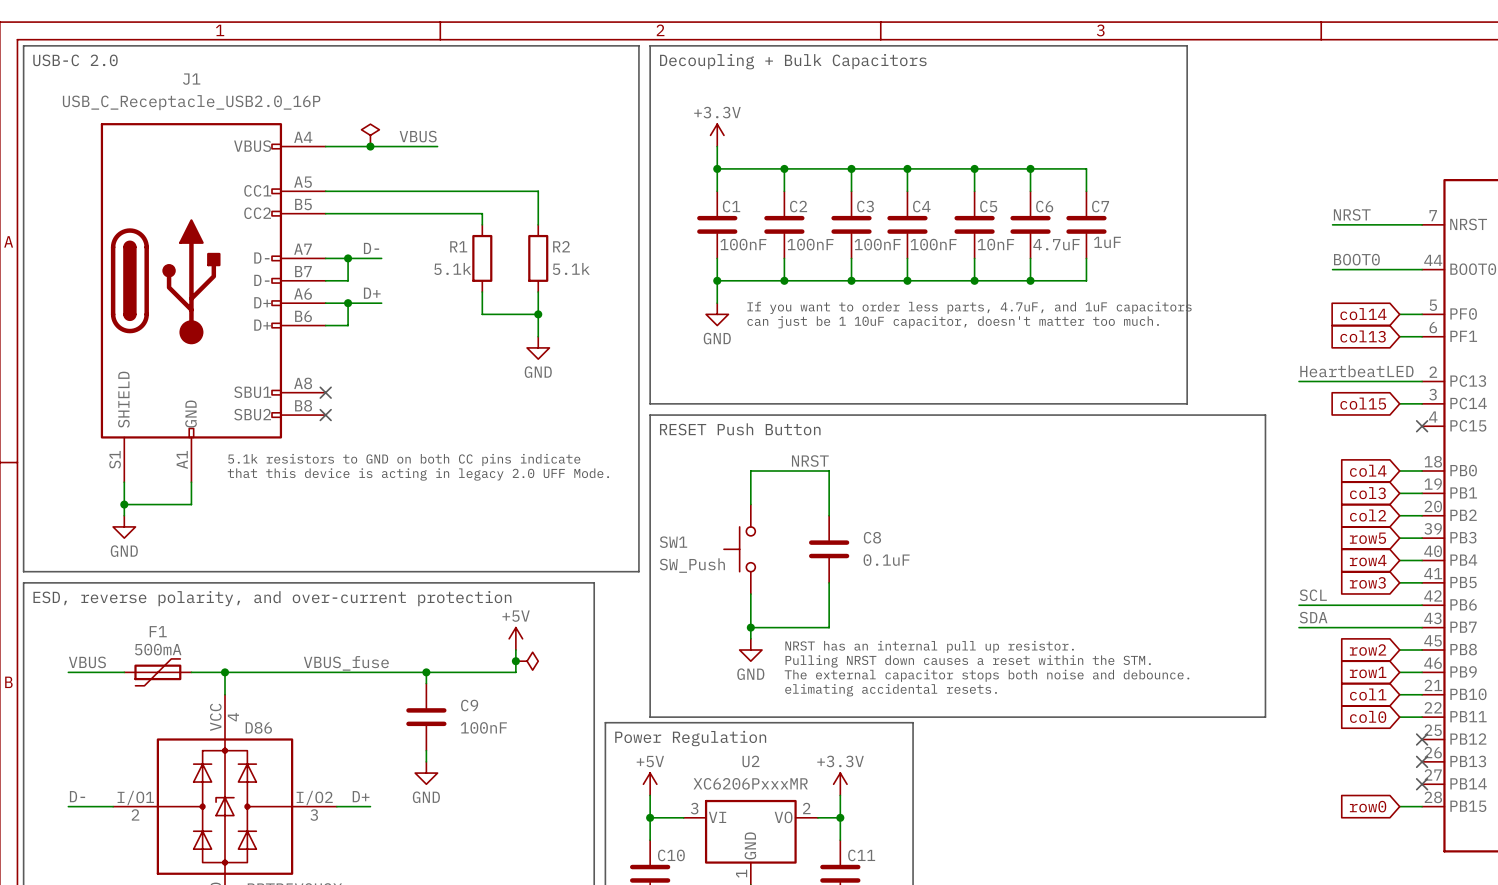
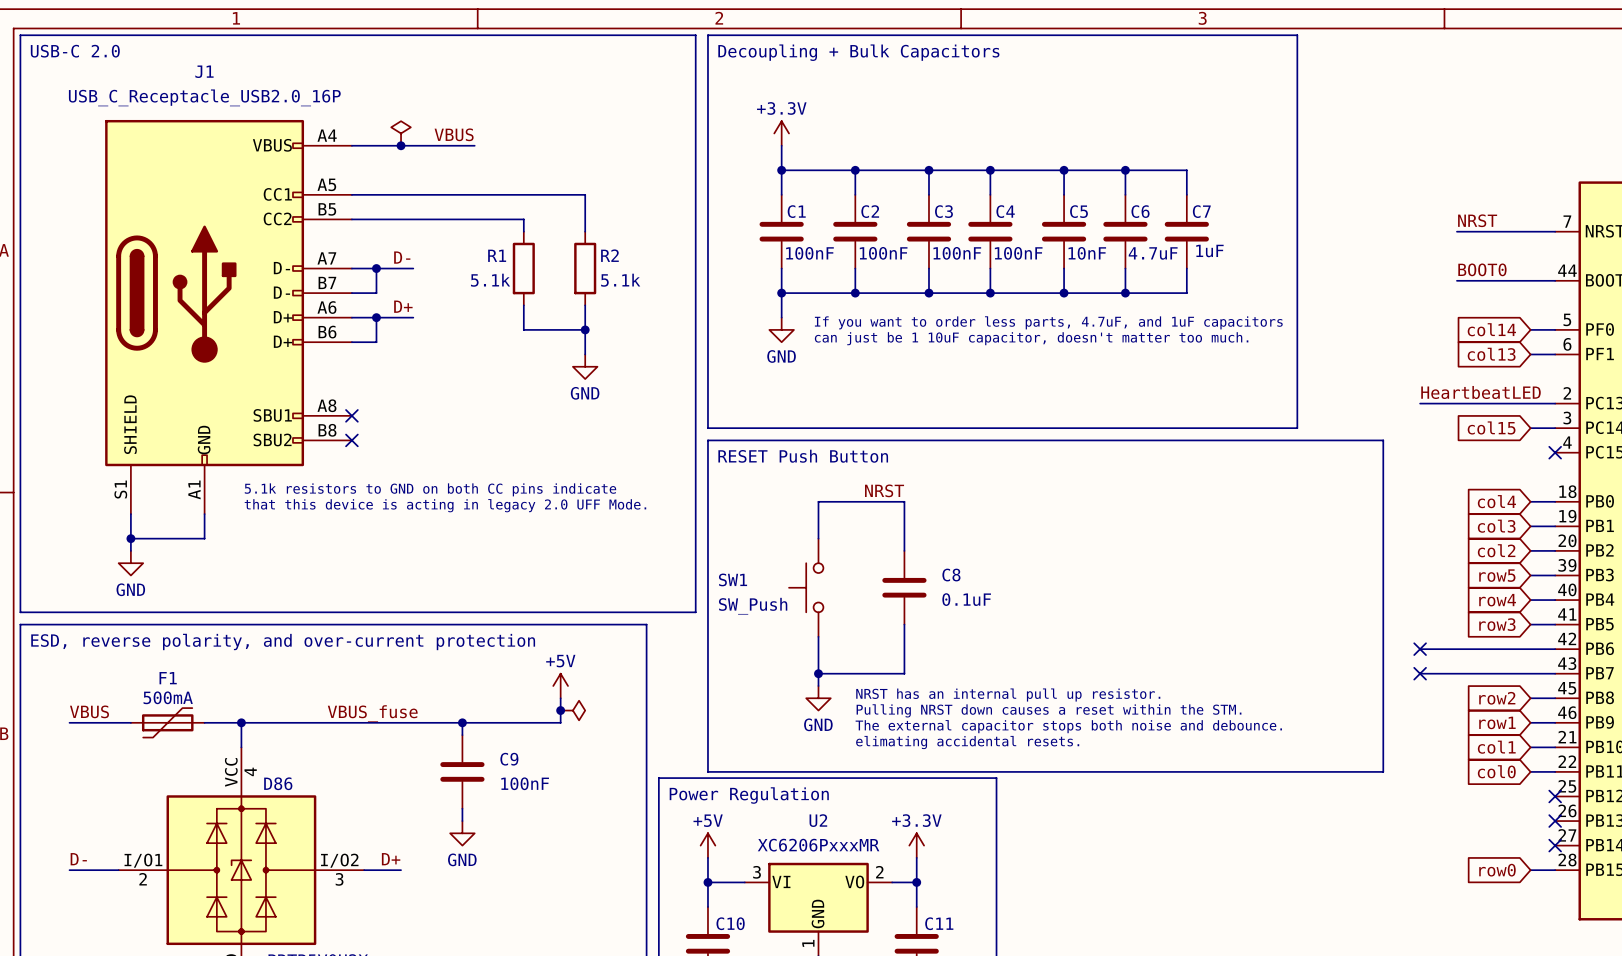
label: SCL (1313, 595) -> none
no-connect mark: none -> (1420, 649)
label: SDA (1313, 617) -> none
no-connect mark: none -> (1420, 673)

